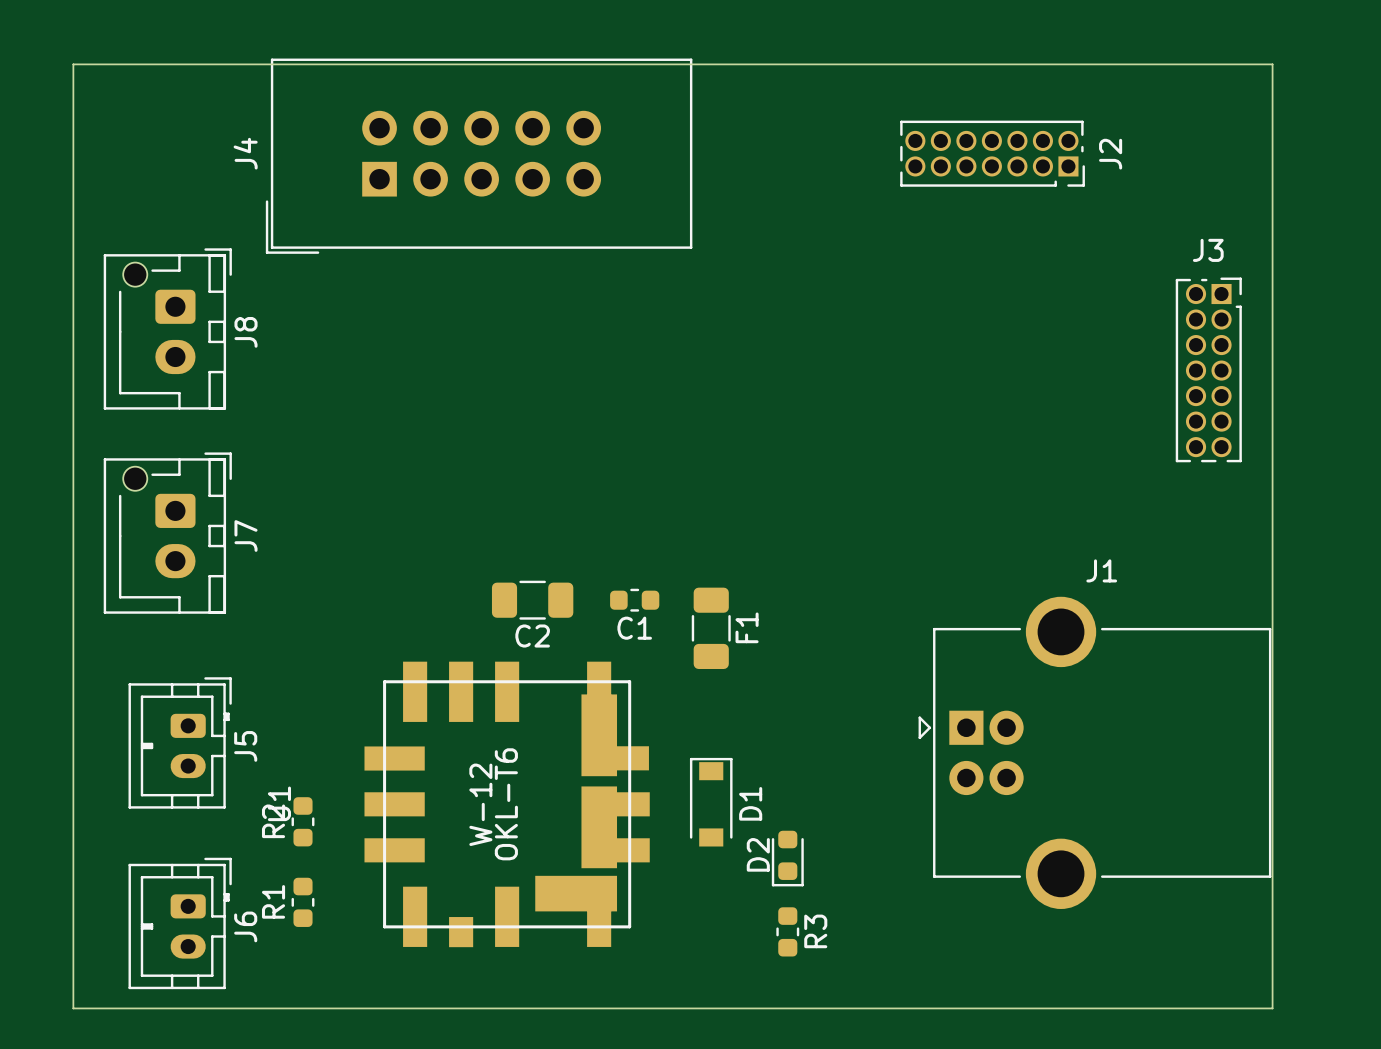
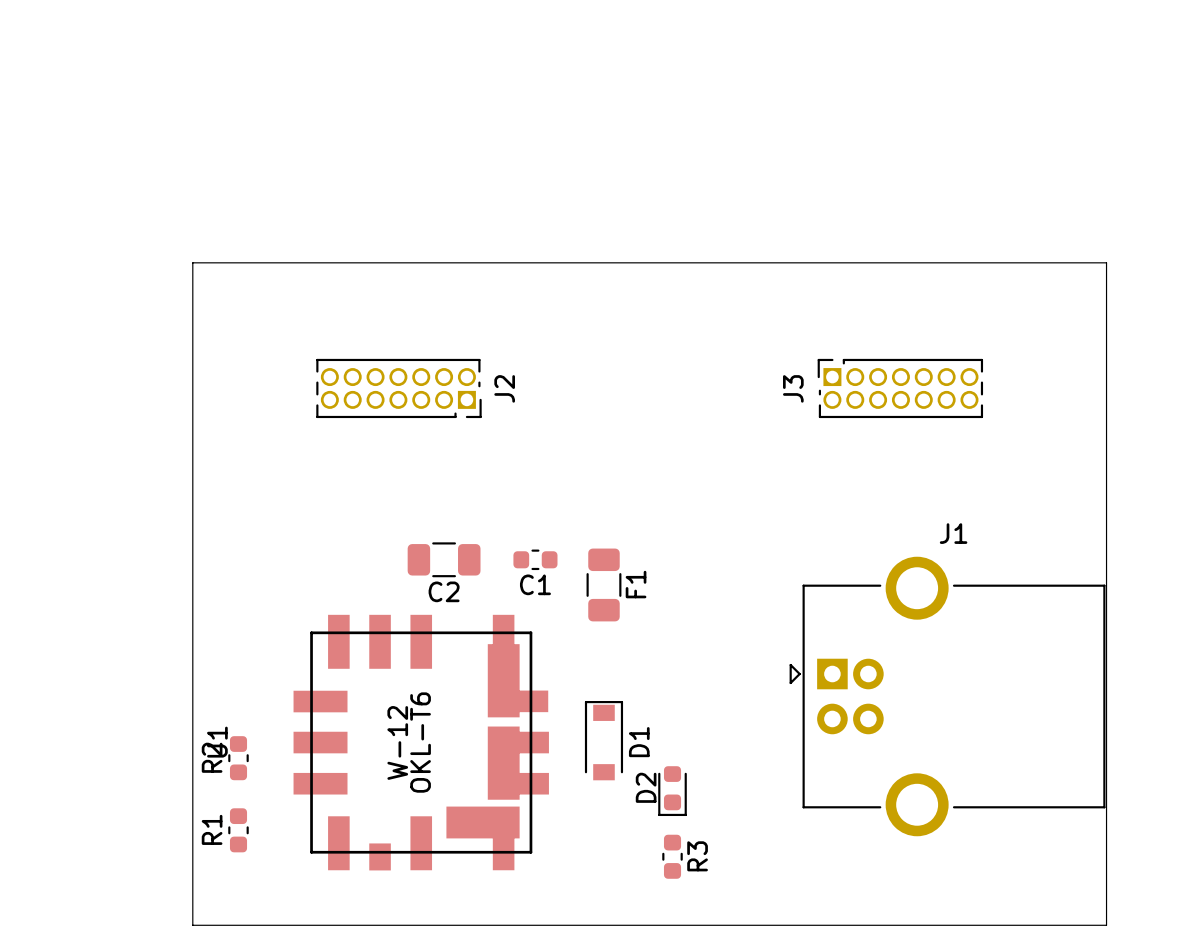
J2 position: (992, 153) -> (398, 388)
J4: (479, 156) -> none
board edge: (1272, 268) (1272, 64) (73, 64) (73, 1008) (251, 1008) -> (1106, 262) (192, 262) (192, 925)
J8: (167, 328) -> none
J3 rotation: 0° (1208, 369) -> 90° counterclockwise (900, 388)
J3 position: (1208, 369) -> (900, 388)
J7: (167, 533) -> none
J5: (180, 742) -> none
J6: (180, 923) -> none

